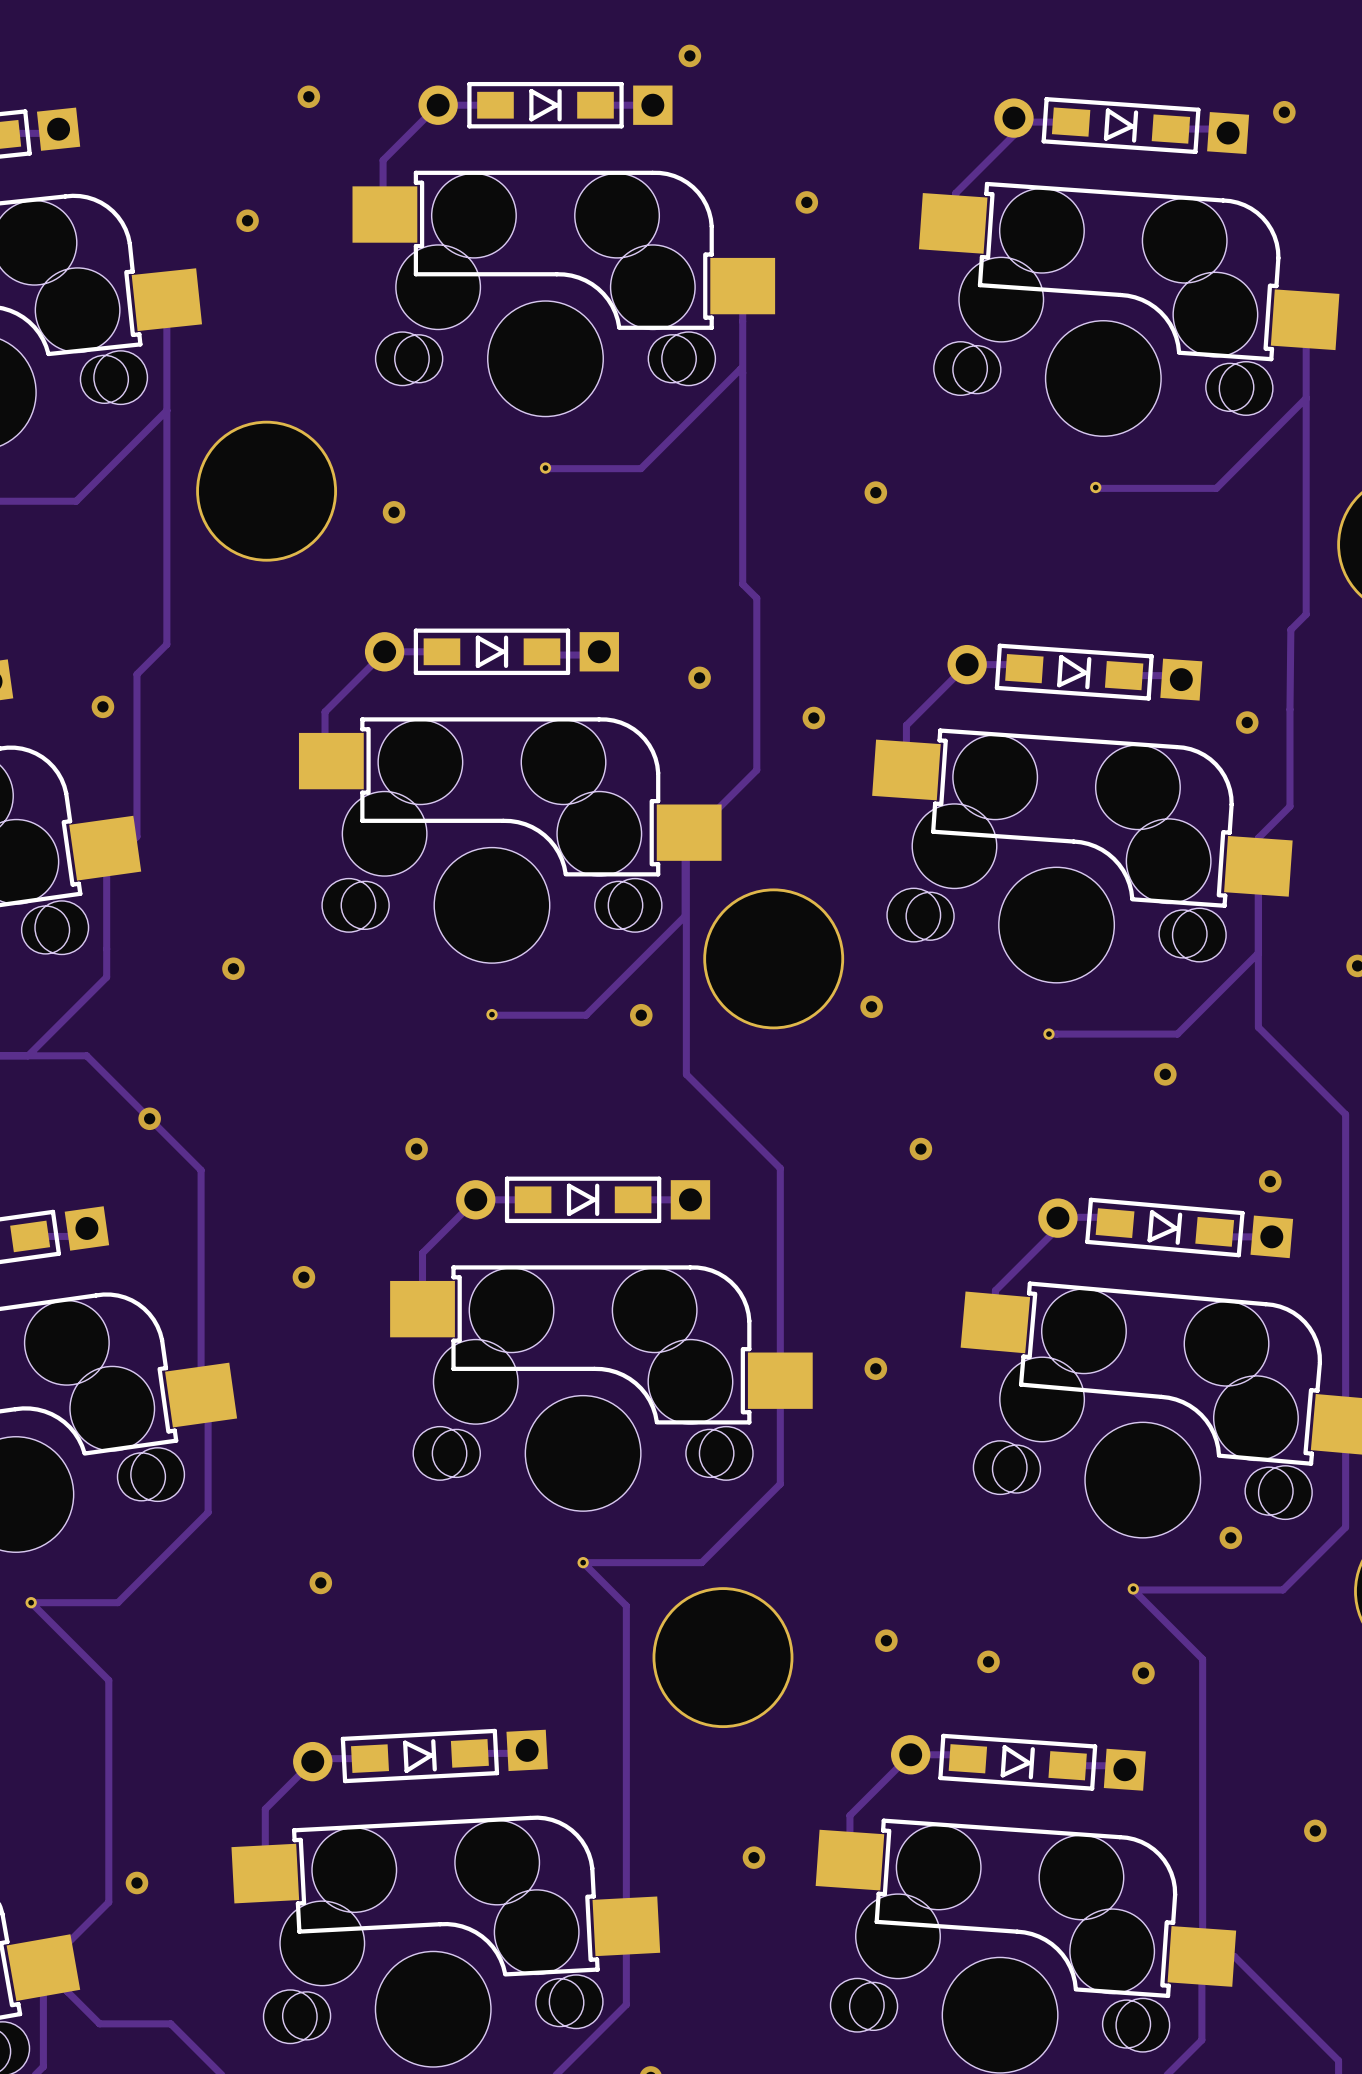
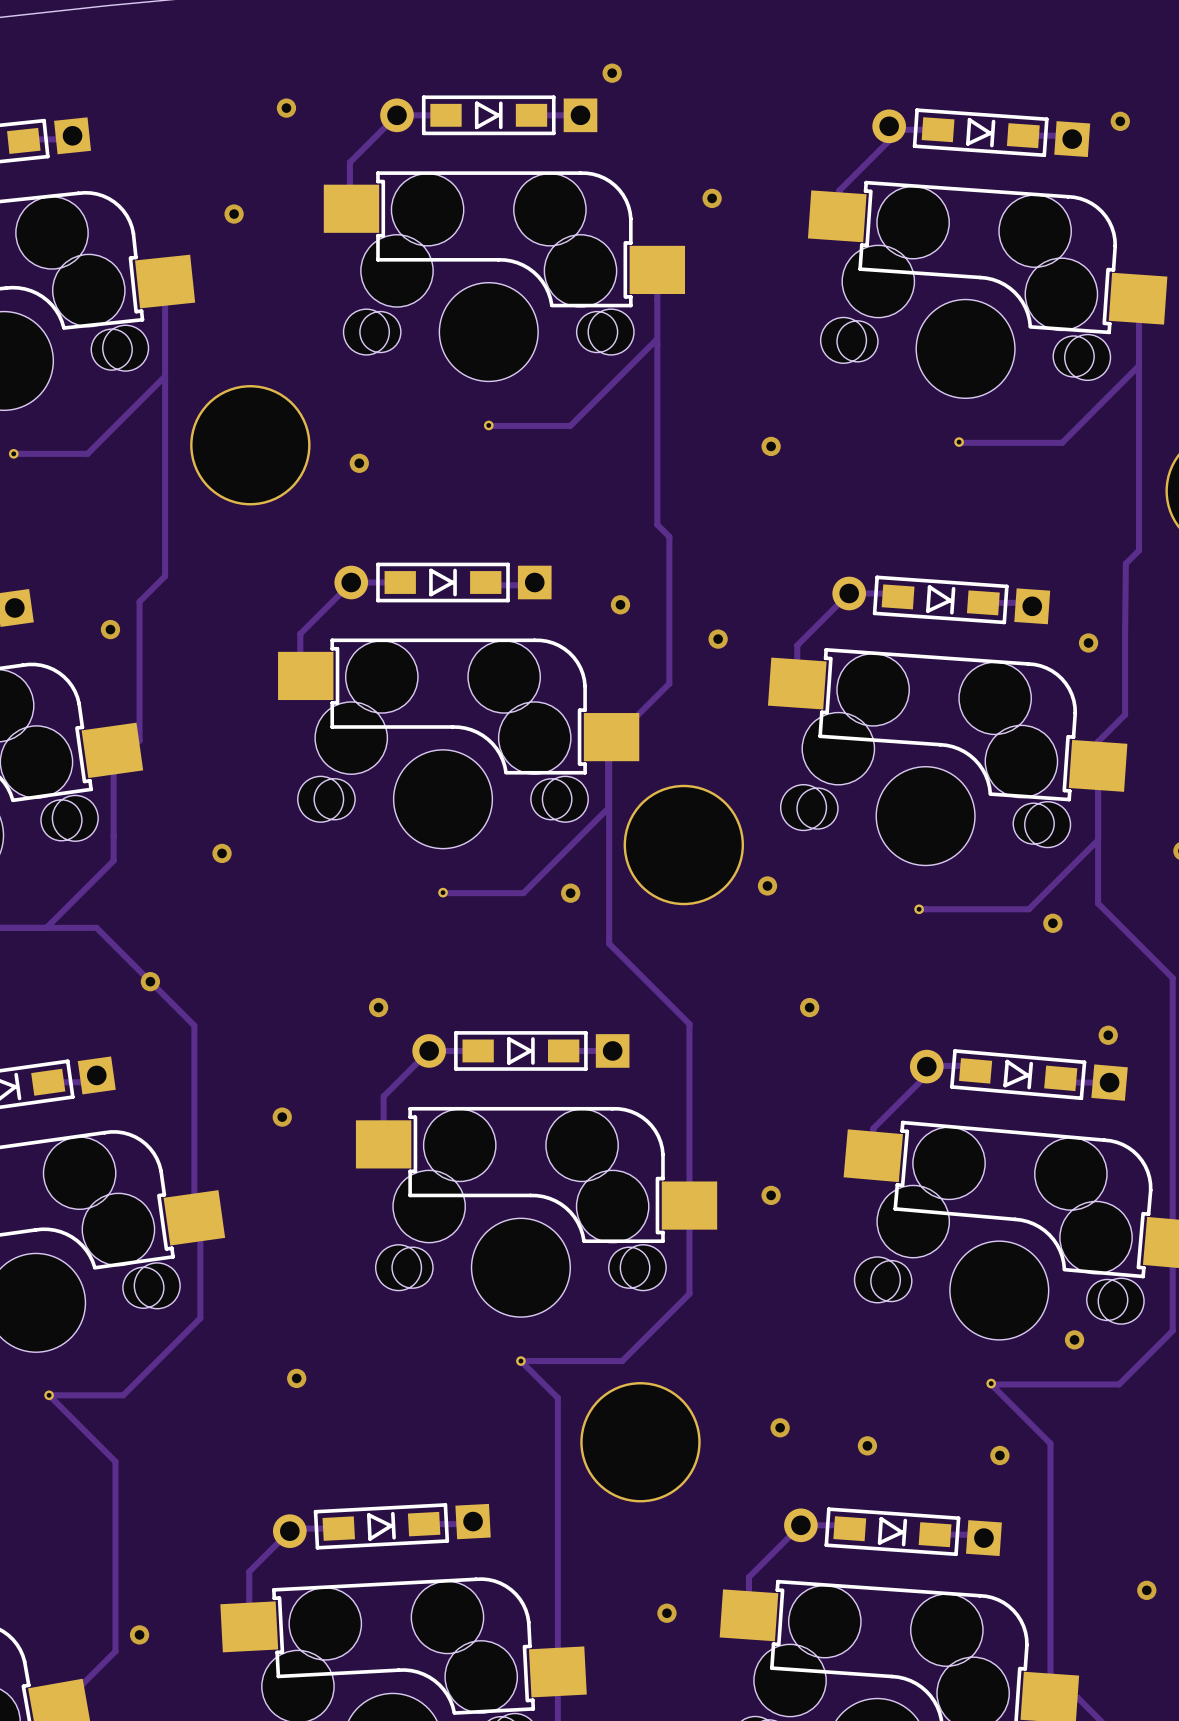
via position: (1165, 1074) -> (1052, 923)

